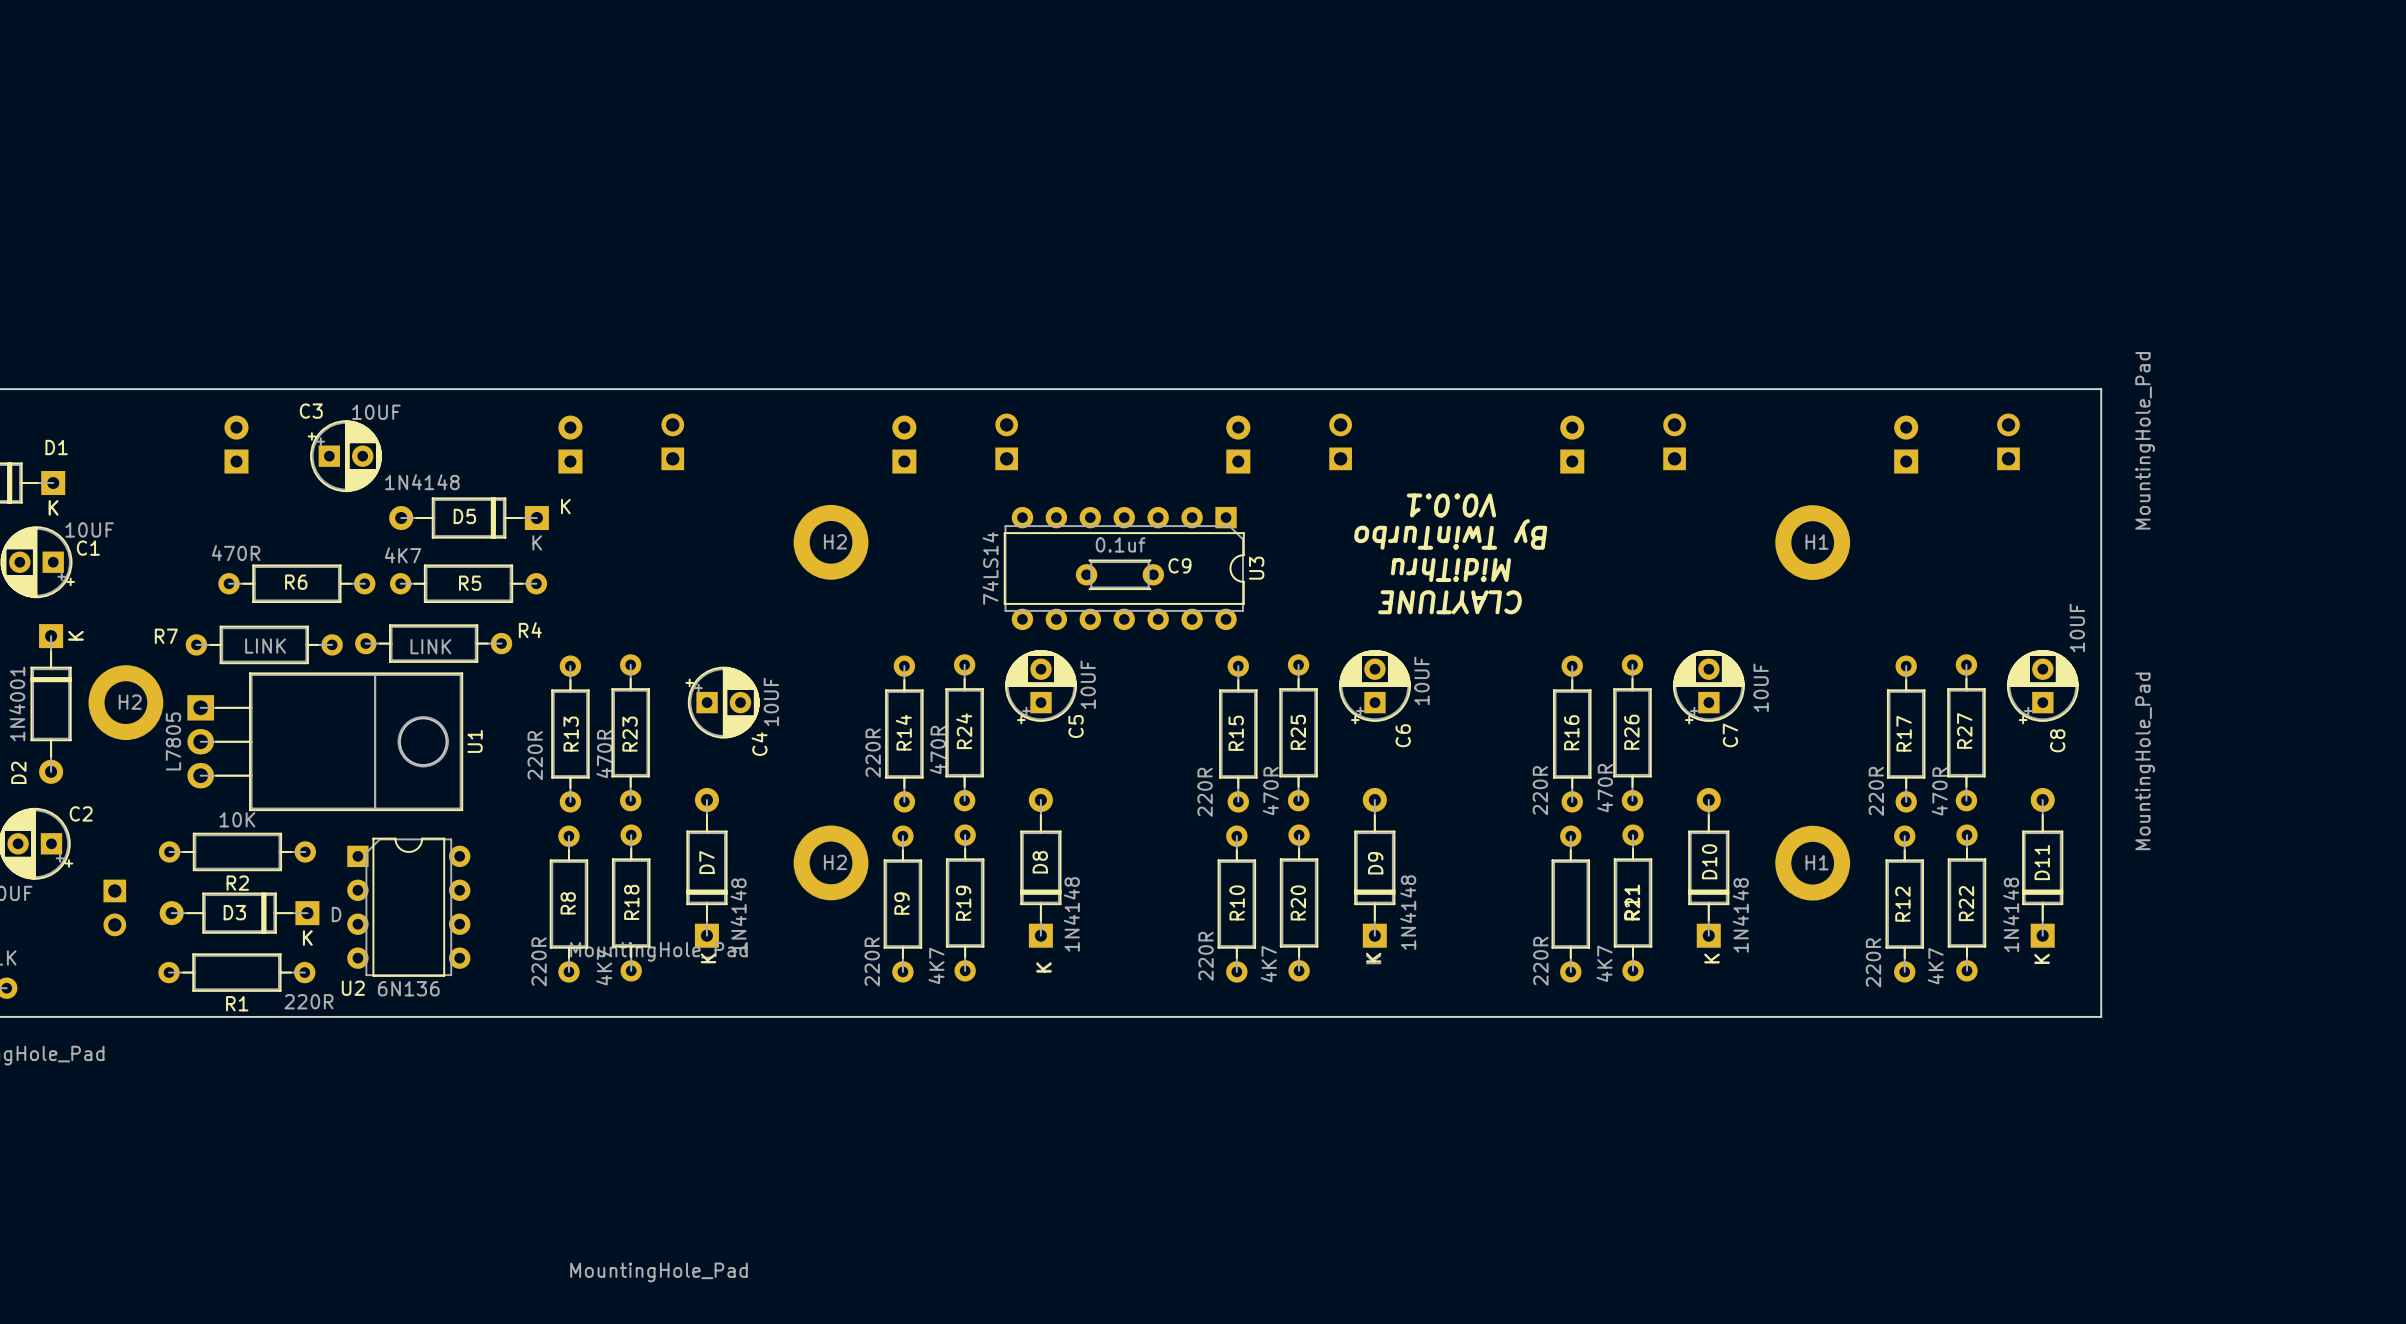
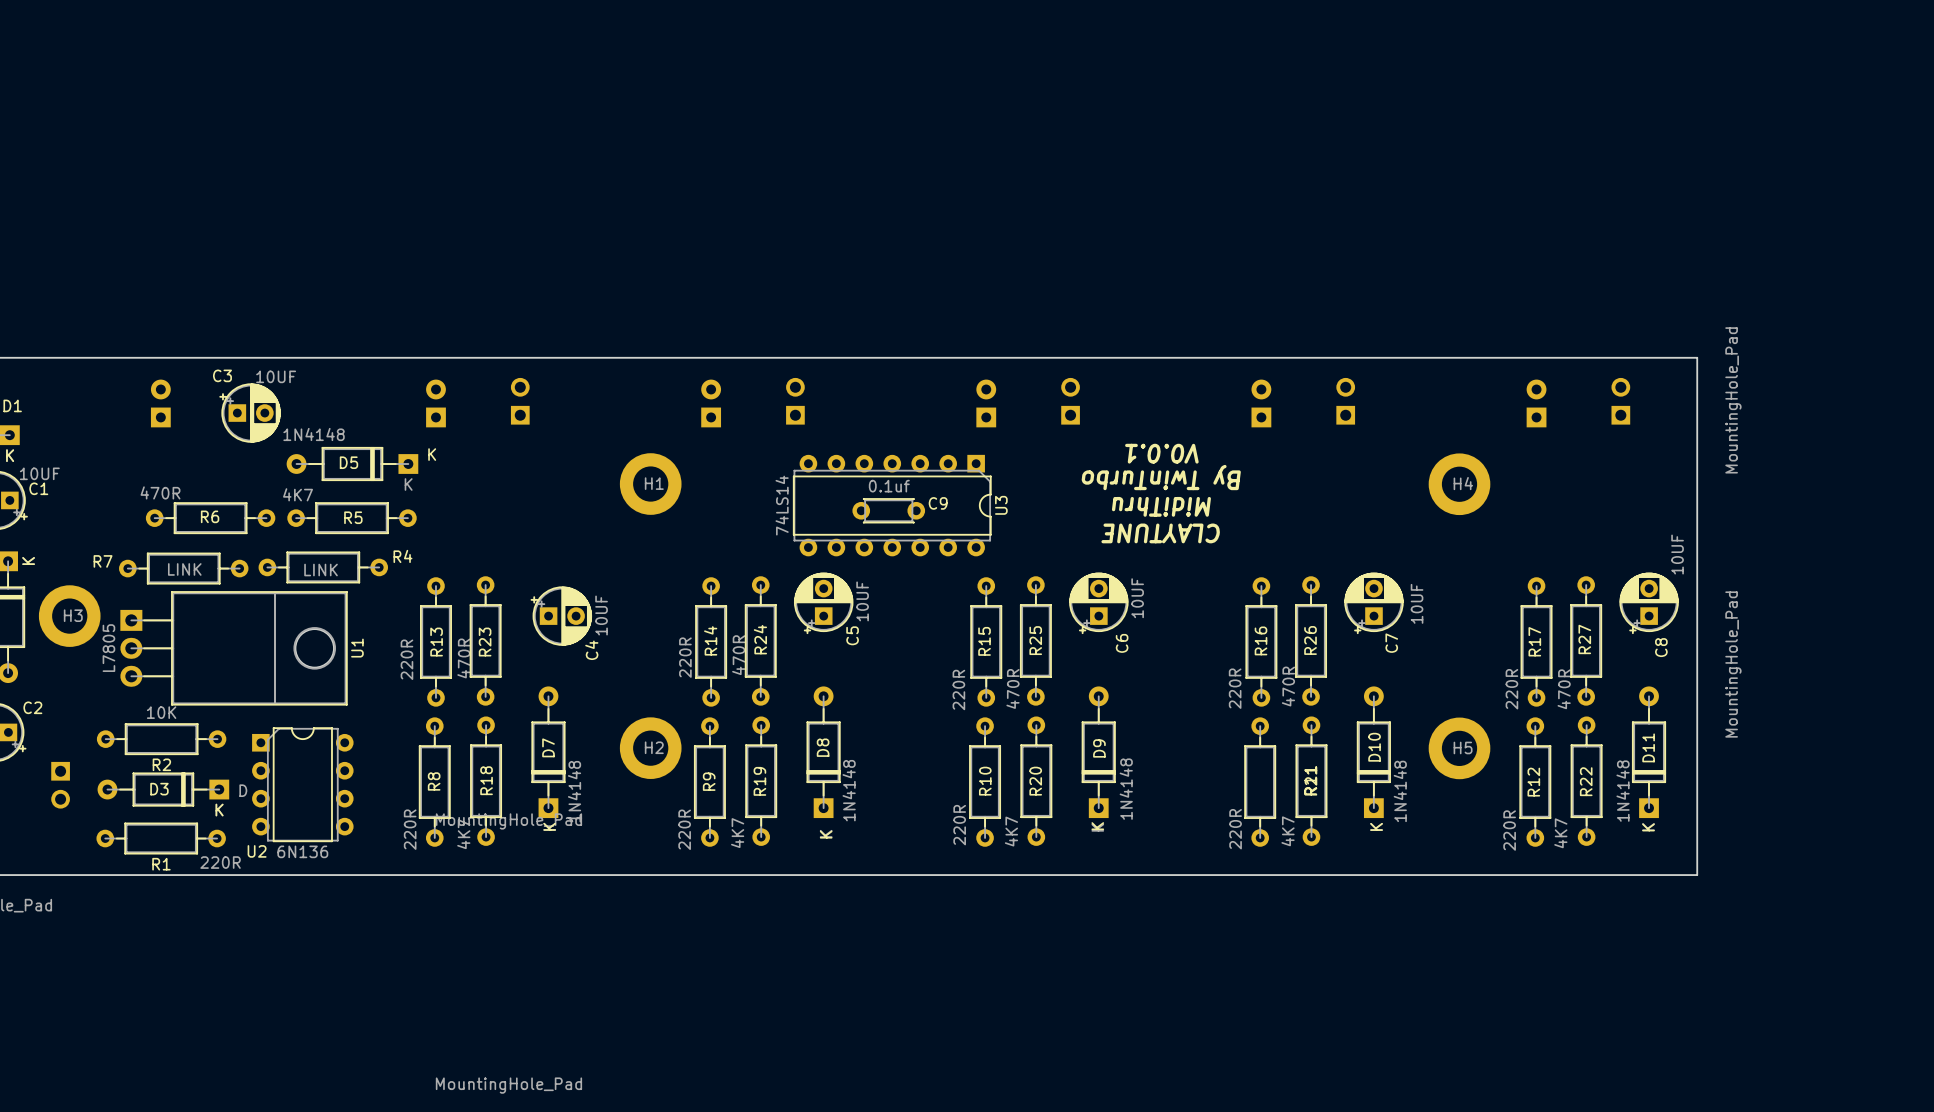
H2 name: H2 (835, 541) -> H1 (654, 483)
H1 name: H1 (1817, 542) -> H4 (1463, 483)
H2 name: H2 (130, 702) -> H3 (73, 615)
H1 name: H1 (1817, 862) -> H5 (1463, 747)

